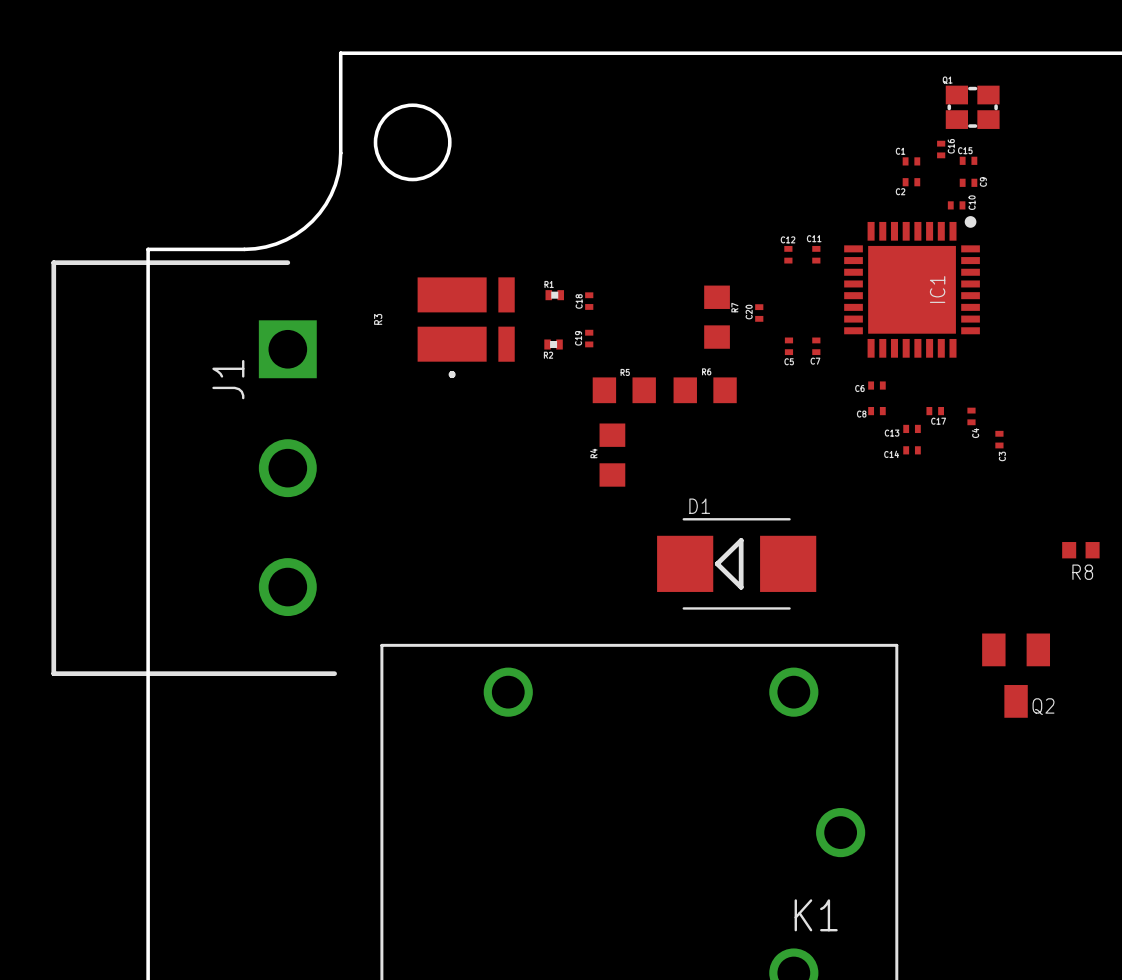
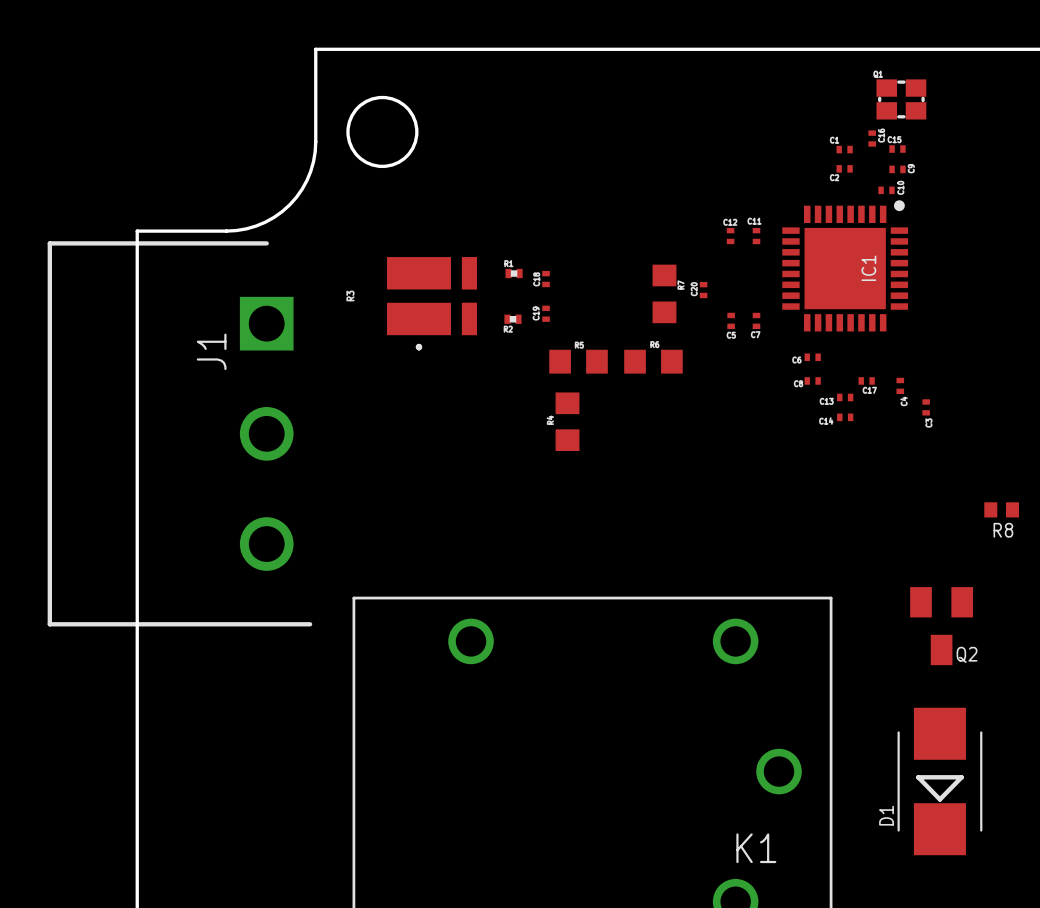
D1 rotation: 0° (736, 563) -> 90° counterclockwise (939, 781)
D1 position: (736, 563) -> (939, 781)

